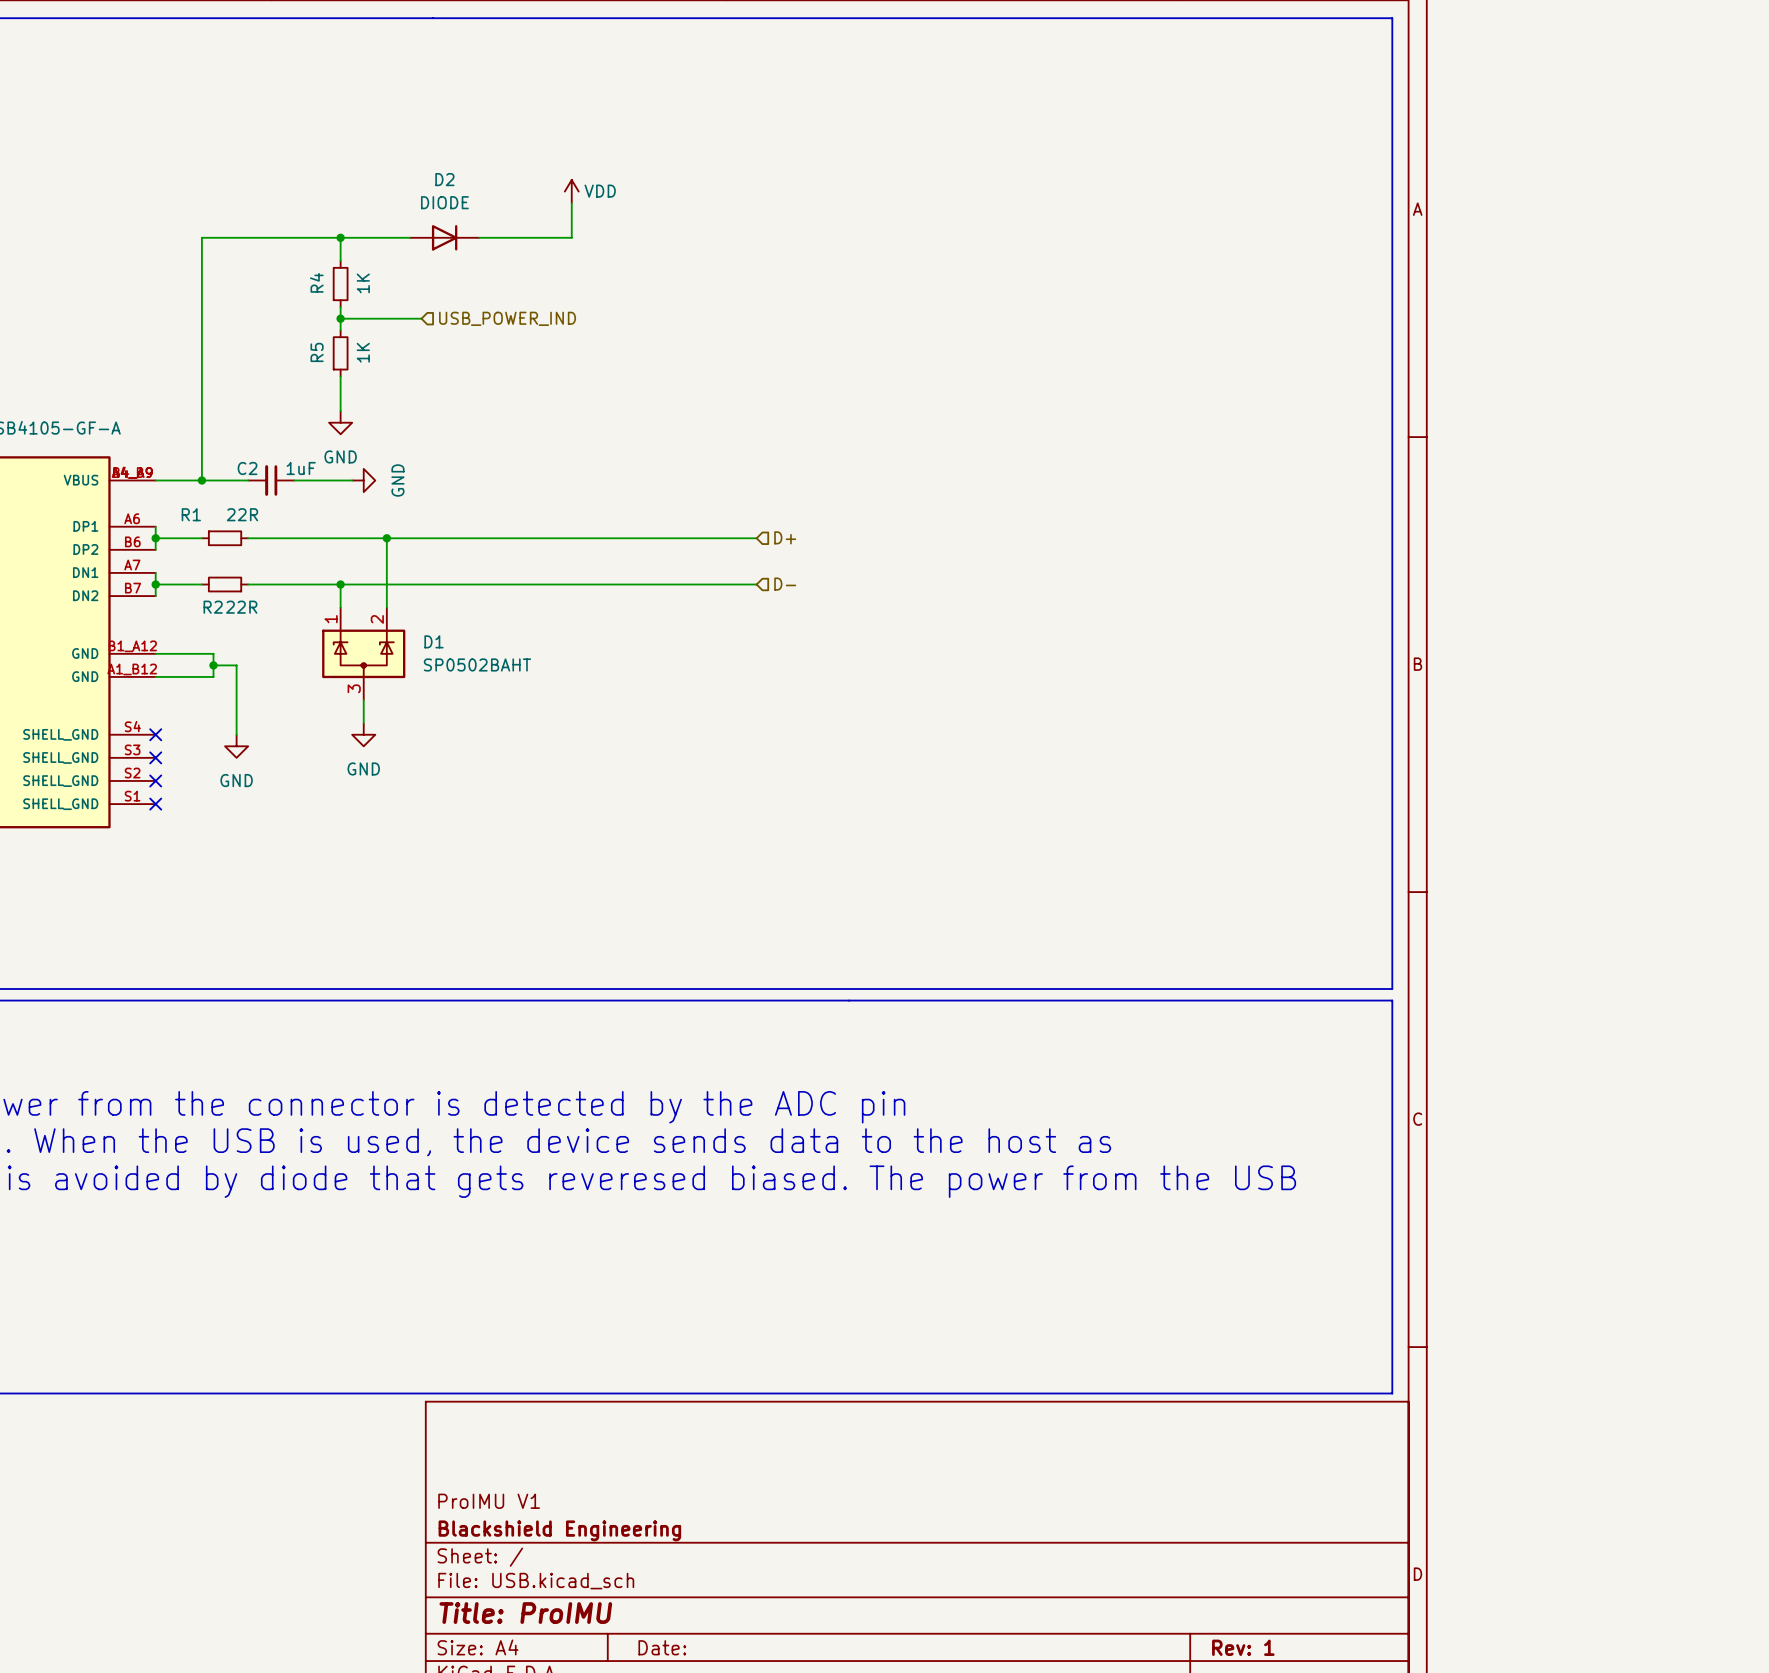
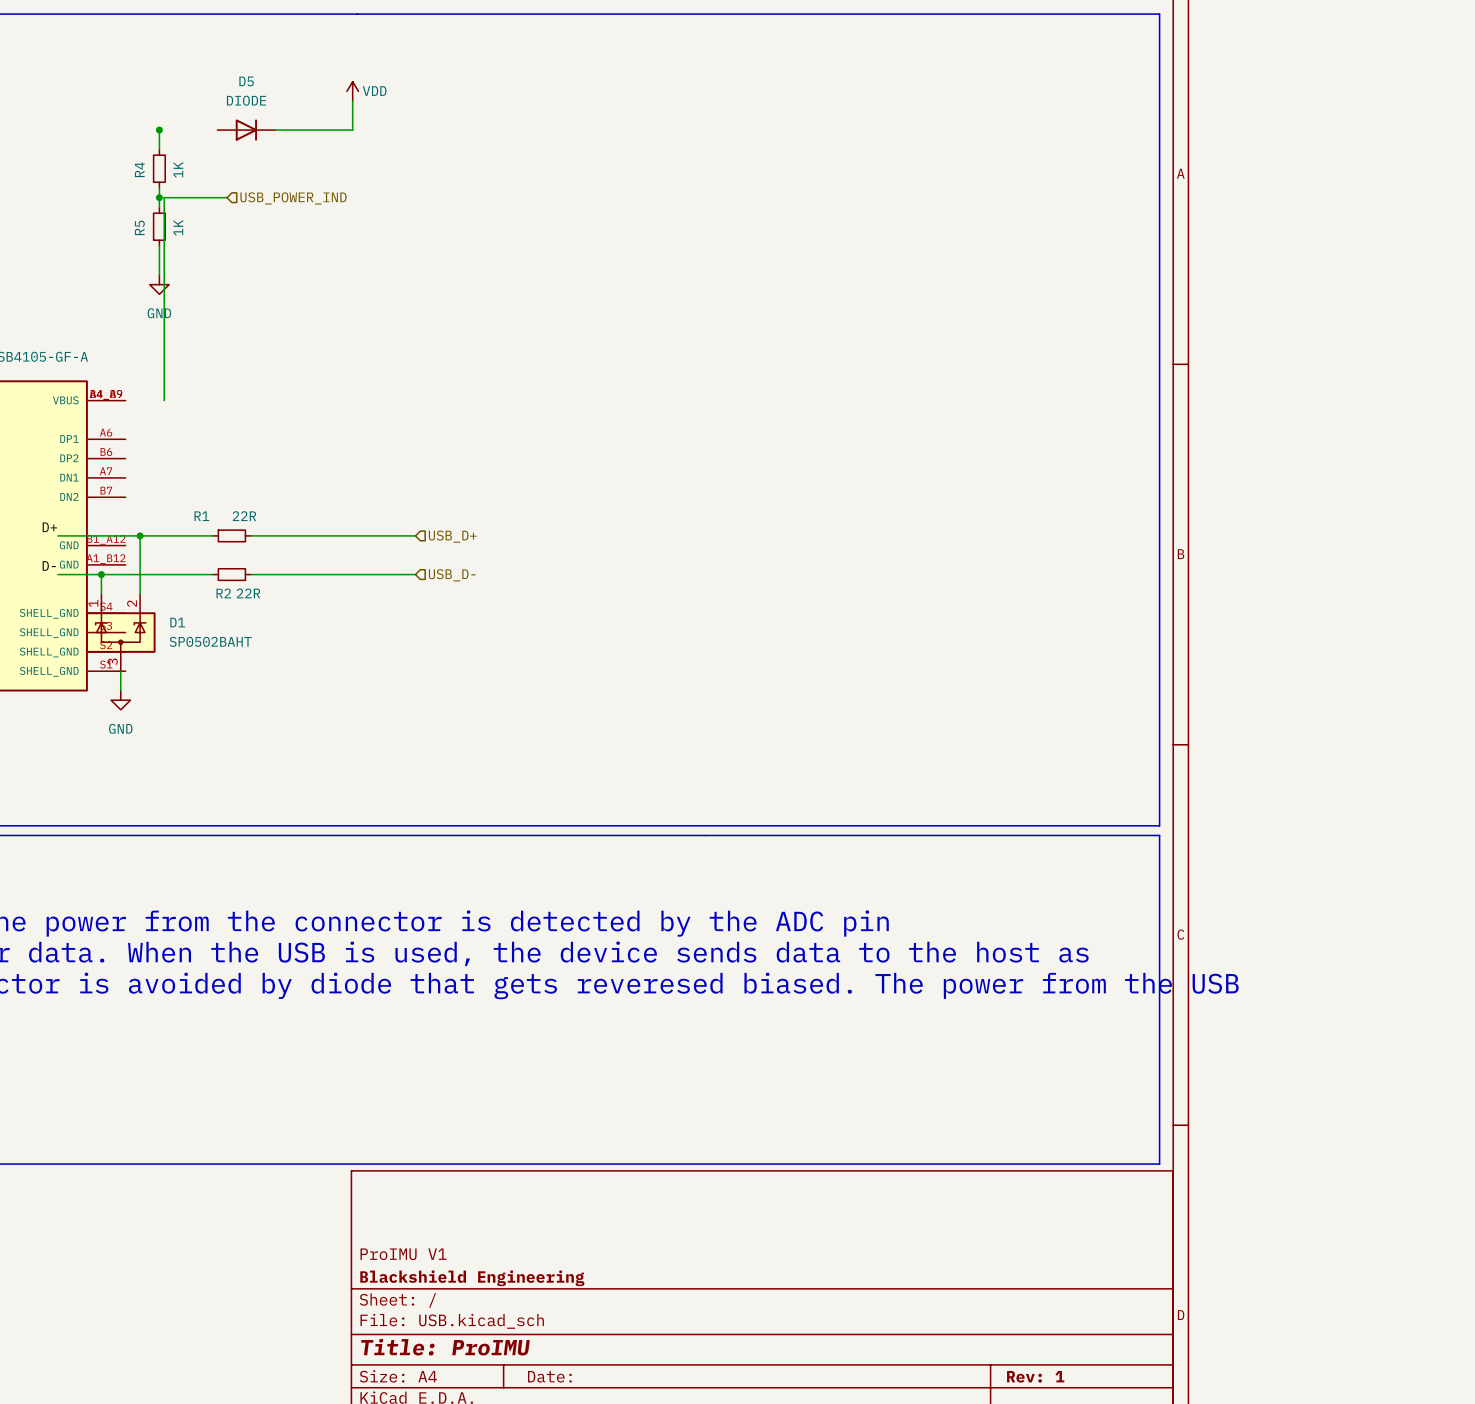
junction: none -> (159, 130)
D5: none -> DIODE (246, 130)
power symbol position: VDD (571, 191) -> VDD (352, 91)
wire: (571, 203) (571, 237) (479, 237) -> (352, 101) (352, 130) (275, 130)
junction: none -> (159, 197)
wire: (277, 237) (409, 237) -> none
wire: (340, 237) (340, 260) -> (159, 130) (159, 149)
junction: (340, 237) -> none
D2: DIODE (444, 237) -> none
R4 position: (340, 284) -> (159, 168)
wire: (340, 307) (340, 330) -> (159, 188) (159, 207)
wire: (340, 318) (421, 318) -> none
junction: (340, 318) -> none
hierarchical label position: USB_POWER_IND (507, 318) -> USB_POWER_IND (293, 198)
power symbol: none -> GND (159, 284)
R5 position: (340, 353) -> (159, 226)
wire: (340, 376) (340, 411) -> (159, 246) (159, 275)
power symbol: GND (340, 422) -> none
wire: (155, 480) (248, 480) -> none
junction: (201, 480) -> none
C2: 1uF (271, 480) -> none
wire: (294, 480) (352, 480) -> none
power symbol: GND (363, 480) -> none
wire: (155, 526) (155, 549) -> none
hierarchical label: D+ (785, 537) -> none
wire: (155, 538) (201, 538) -> none
junction: (155, 538) -> none
R1 position: (225, 538) -> (231, 535)
wire: (248, 538) (756, 538) -> none
wire: (386, 538) (386, 607) -> none
junction: (386, 538) -> none
wire: (155, 572) (155, 596) -> (101, 574) (101, 593)
wire: (155, 584) (201, 584) -> none
junction: (155, 584) -> none
R2 position: (225, 584) -> (231, 574)
wire: (248, 584) (756, 584) -> none
wire: (340, 584) (340, 607) -> none
junction: (340, 584) -> none
hierarchical label: D- (785, 584) -> none
label: none -> D+ (49, 527)
wire: none -> (57, 535) (212, 535)
wire: none -> (140, 535) (140, 593)
junction: none -> (140, 535)
wire: none -> (251, 535) (415, 535)
hierarchical label: none -> USB_D+ (452, 536)
wire: (155, 653) (213, 653) (213, 676) (155, 676) -> none
D1 position: (363, 653) -> (120, 632)
wire: (213, 665) (236, 665) (236, 734) -> none
junction: (213, 665) -> none
label: none -> D- (49, 565)
wire: none -> (57, 574) (212, 574)
junction: none -> (101, 574)
wire: none -> (251, 574) (415, 574)
hierarchical label: none -> USB_D- (452, 575)
wire: (363, 700) (363, 723) -> none
no-connect mark: (155, 734) -> none
power symbol: GND (363, 734) -> none
power symbol: GND (236, 746) -> none
no-connect mark: (155, 757) -> none
no-connect mark: (155, 780) -> none
wire: none -> (120, 671) (120, 690)
no-connect mark: (155, 804) -> none
power symbol: none -> GND (120, 700)

